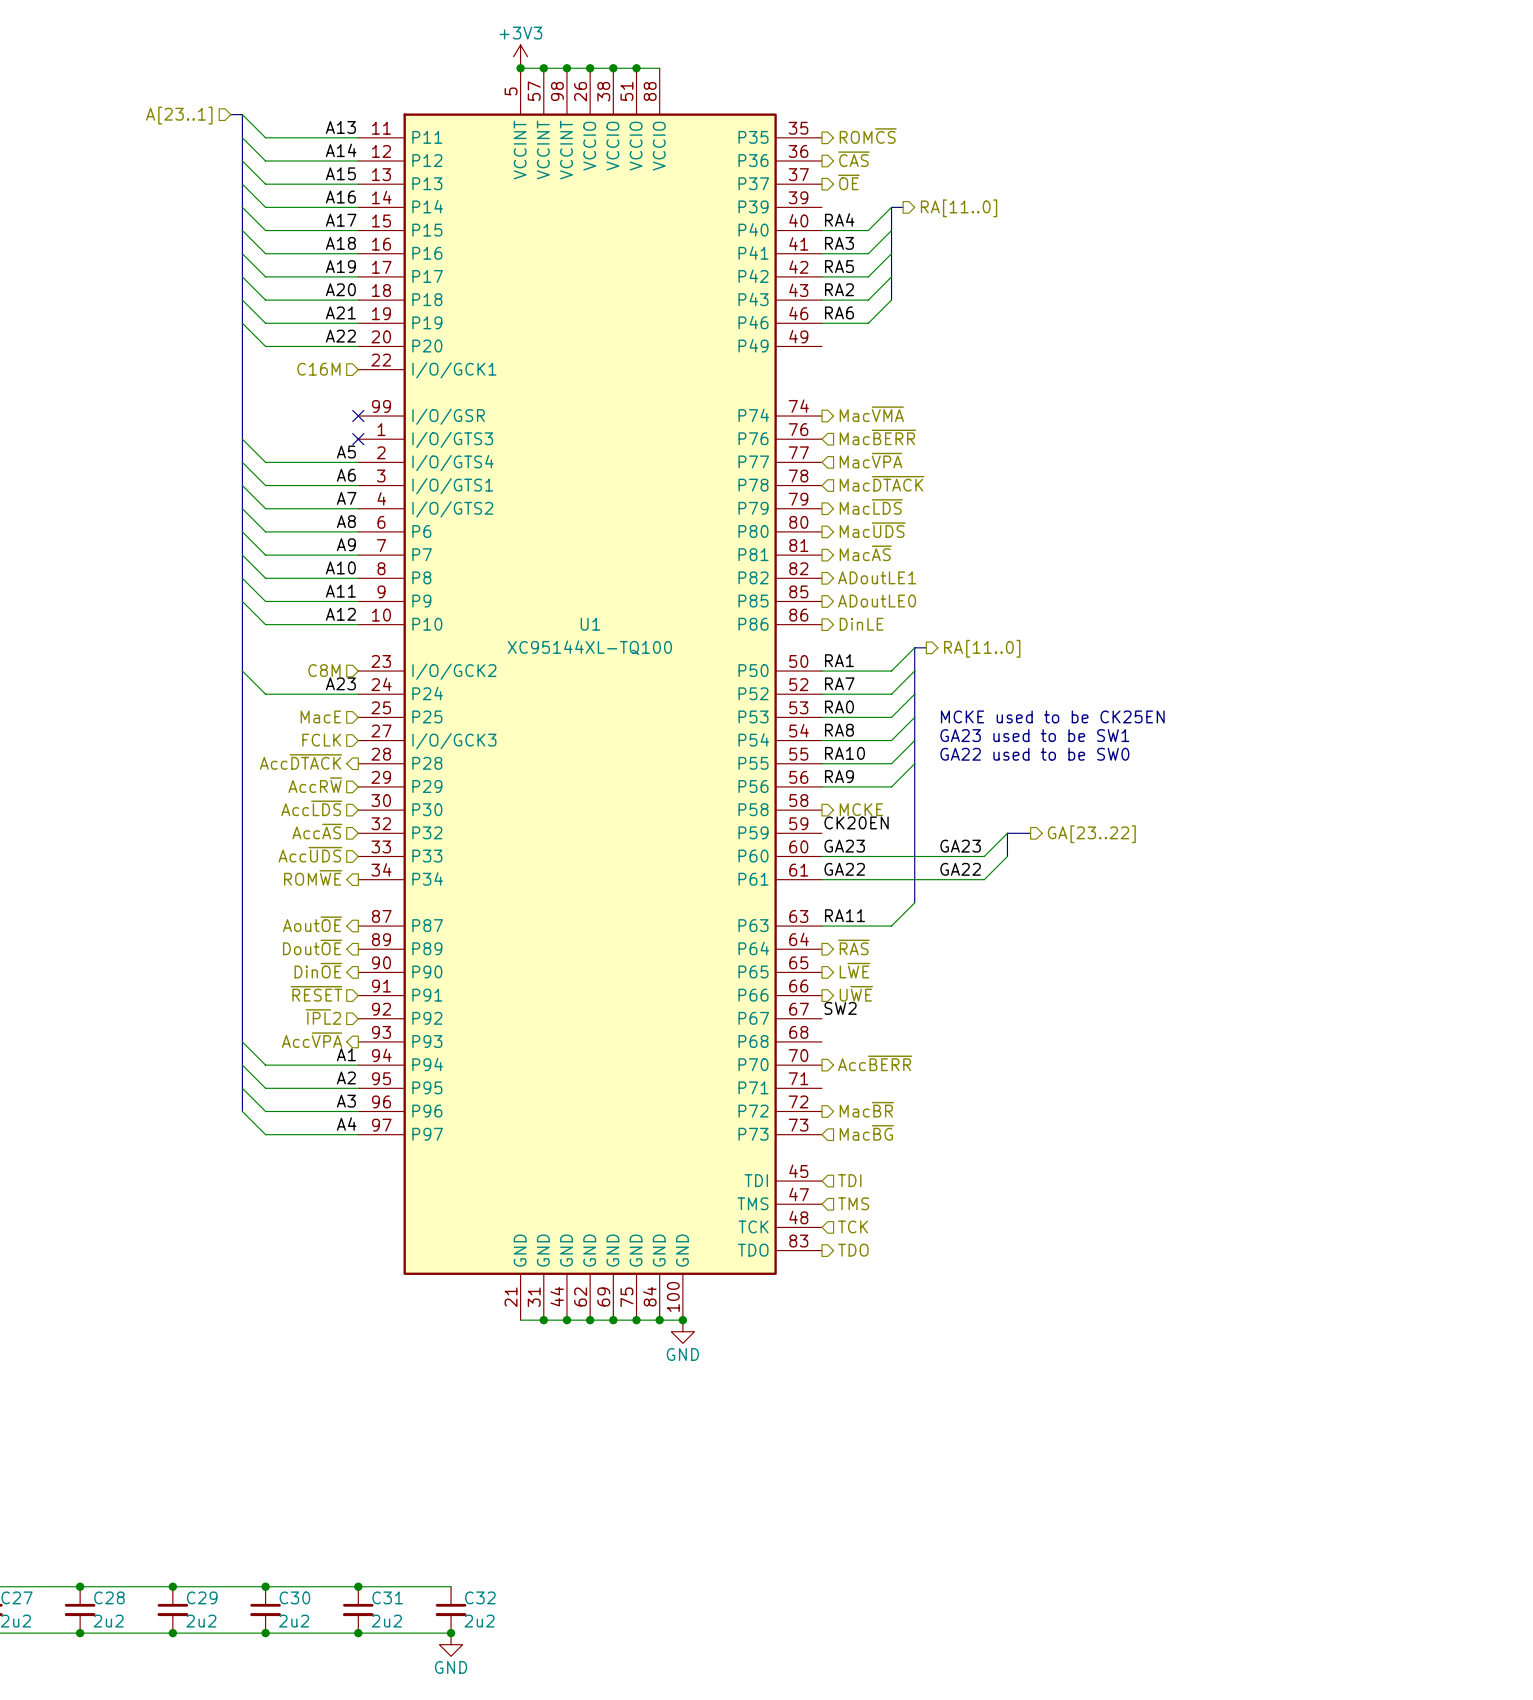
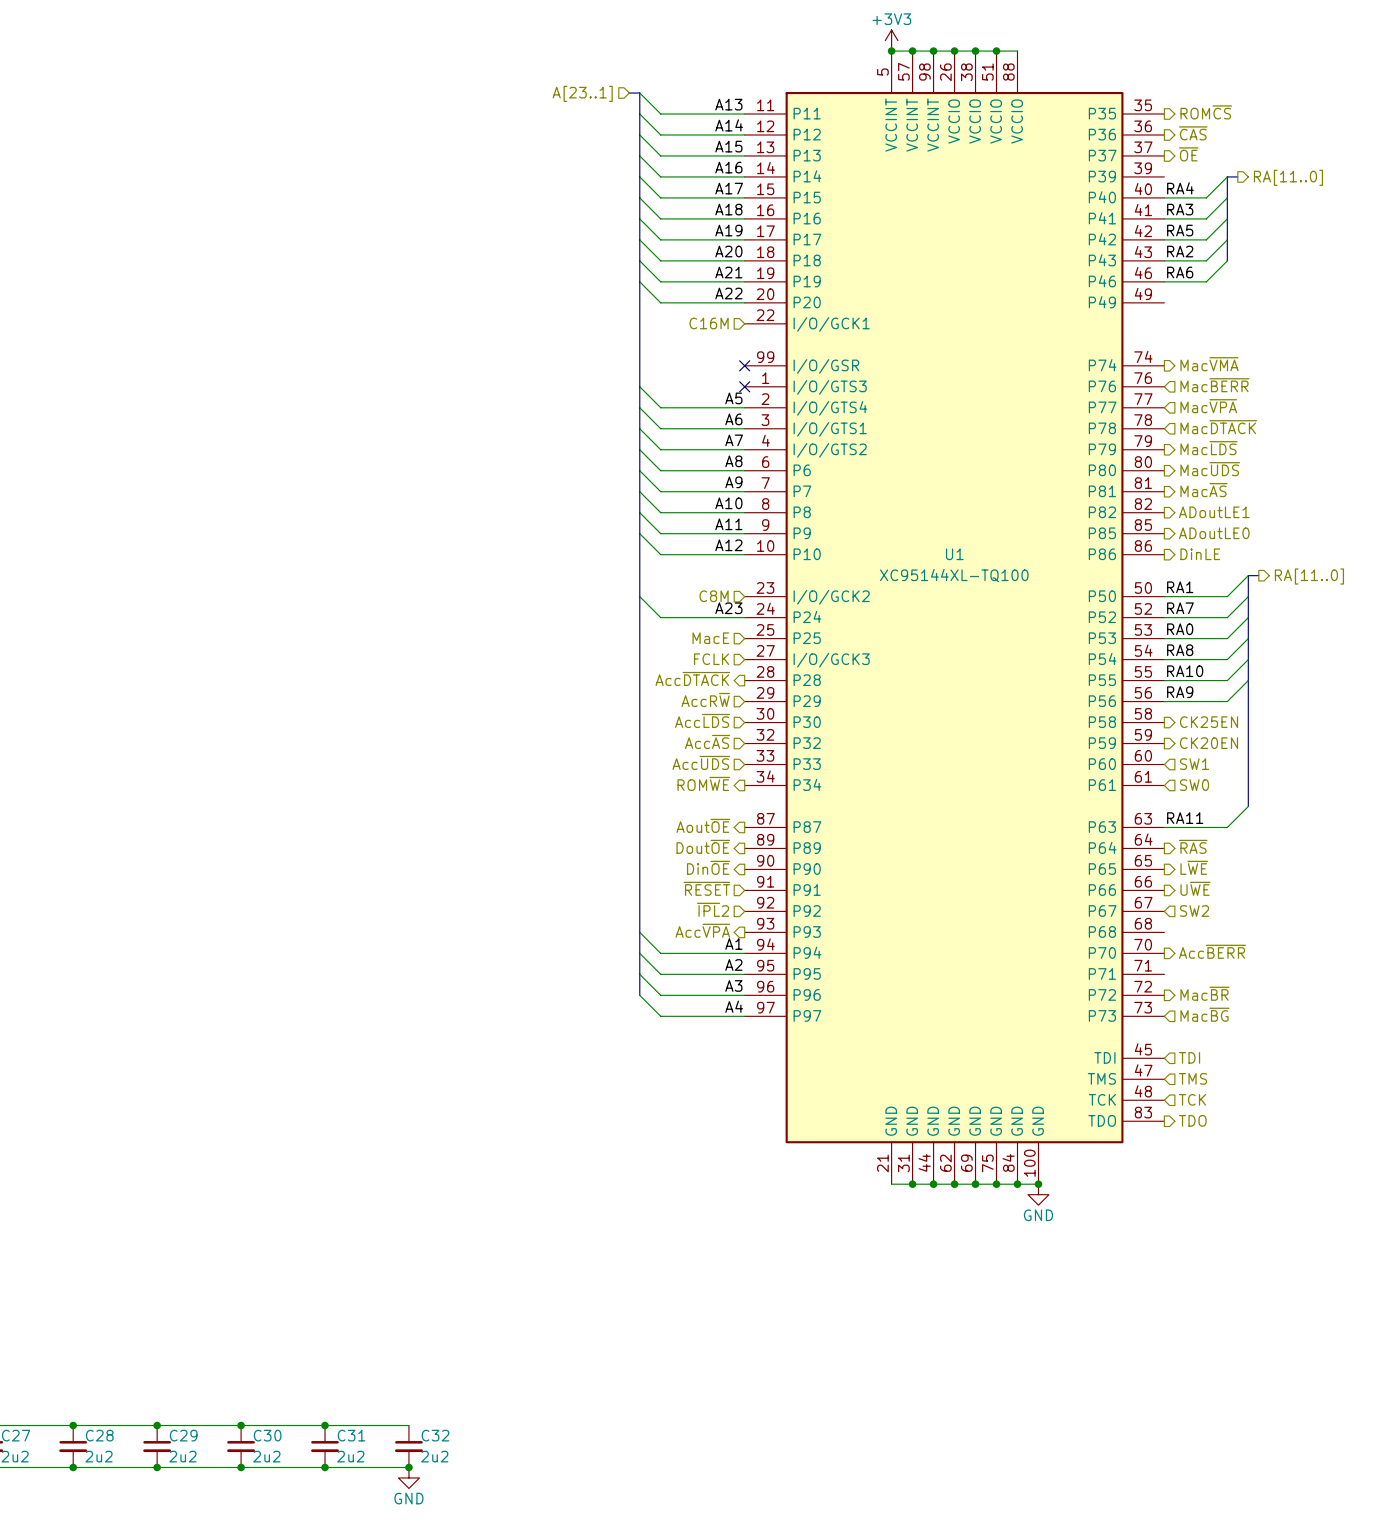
power symbol: +3V3 (520, 56) -> none
power symbol: none -> +3V3 (891, 40)
wire: (520, 68) (659, 68) -> none
junction: (520, 68) -> none
junction: (543, 68) -> none
junction: (566, 68) -> none
junction: (590, 68) -> none
junction: (613, 68) -> none
junction: (636, 68) -> none
wire: none -> (891, 51) (1017, 51)
junction: none -> (891, 51)
junction: none -> (912, 51)
junction: none -> (933, 51)
junction: none -> (954, 51)
junction: none -> (975, 51)
junction: none -> (996, 51)
bus: (230, 114) (242, 114) (242, 1111) -> none
wire: (242, 114) (265, 137) (358, 137) -> none
bus: none -> (629, 93) (639, 93) (639, 995)
hierarchical label: A[23..1] (179, 115) -> none
hierarchical label: none -> A[23..1] (582, 93)
label: A13 (340, 127) -> none
label: none -> A13 (728, 104)
hierarchical label: ROM~{CS} (868, 136) -> none
hierarchical label: none -> ROM~{CS} (1206, 112)
wire: (242, 137) (265, 161) (358, 161) -> none
label: A14 (341, 150) -> none
label: none -> A14 (729, 125)
hierarchical label: ~{CAS} (853, 159) -> none
hierarchical label: none -> ~{CAS} (1193, 133)
wire: (242, 161) (265, 184) (358, 184) -> none
label: A15 (340, 173) -> none
label: none -> A15 (728, 146)
hierarchical label: ~{OE} (848, 182) -> none
hierarchical label: none -> ~{OE} (1188, 154)
wire: (242, 184) (265, 207) (358, 207) -> none
label: A16 (340, 197) -> none
label: none -> A16 (728, 167)
wire: (242, 207) (265, 230) (358, 230) -> none
bus: (903, 207) (891, 207) (891, 300) -> none
wire: none -> (1227, 176) (1206, 197) (1164, 197)
bus: none -> (1237, 176) (1227, 176) (1227, 260)
hierarchical label: RA[11..0] (959, 208) -> none
hierarchical label: none -> RA[11..0] (1288, 177)
label: RA4 (839, 219) -> A17 (729, 188)
label: none -> RA4 (1180, 188)
label: A17 (341, 220) -> none
wire: (242, 230) (265, 253) (358, 253) -> none
wire: none -> (1227, 197) (1206, 218) (1164, 218)
label: A18 (340, 243) -> none
label: RA3 (839, 243) -> A18 (728, 209)
label: none -> RA3 (1180, 209)
wire: (242, 253) (265, 276) (358, 276) -> none
wire: none -> (1227, 218) (1206, 239) (1164, 239)
label: A19 (340, 266) -> none
label: RA5 (839, 266) -> A19 (728, 230)
label: none -> RA5 (1180, 230)
wire: (242, 276) (265, 300) (358, 300) -> none
wire: none -> (1227, 239) (1206, 260) (1164, 260)
label: A20 (340, 289) -> none
label: RA2 (839, 289) -> A20 (728, 251)
label: none -> RA2 (1180, 251)
wire: (242, 300) (265, 323) (358, 323) -> none
wire: none -> (1227, 260) (1206, 281) (1164, 281)
label: A21 (340, 312) -> none
label: RA6 (839, 312) -> A21 (728, 272)
label: none -> RA6 (1180, 272)
wire: (242, 323) (265, 346) (358, 346) -> none
label: A22 (340, 336) -> none
label: none -> A22 (728, 293)
hierarchical label: C16M (318, 369) -> none
hierarchical label: none -> C16M (709, 323)
hierarchical label: Mac~{VMA} (871, 414) -> none
hierarchical label: none -> Mac~{VMA} (1209, 364)
no-connect mark: (358, 416) -> none
no-connect mark: none -> (744, 365)
hierarchical label: Mac~{BERR} (877, 437) -> none
hierarchical label: none -> Mac~{BERR} (1214, 385)
wire: (242, 439) (265, 462) (358, 462) -> none
no-connect mark: (358, 439) -> none
no-connect mark: none -> (744, 386)
label: A5 (346, 452) -> none
label: none -> A5 (733, 398)
hierarchical label: Mac~{VPA} (871, 460) -> none
hierarchical label: none -> Mac~{VPA} (1208, 406)
wire: (242, 462) (265, 485) (358, 485) -> none
label: A6 (346, 475) -> none
label: none -> A6 (733, 419)
hierarchical label: Mac~{DTACK} (882, 483) -> none
hierarchical label: none -> Mac~{DTACK} (1218, 427)
wire: (242, 485) (265, 508) (358, 508) -> none
label: A7 (346, 498) -> none
label: none -> A7 (734, 440)
hierarchical label: Mac~{LDS} (871, 506) -> none
hierarchical label: none -> Mac~{LDS} (1208, 448)
wire: (242, 508) (265, 531) (358, 531) -> none
label: A8 (346, 521) -> none
label: none -> A8 (733, 461)
hierarchical label: Mac~{UDS} (872, 530) -> none
hierarchical label: none -> Mac~{UDS} (1210, 469)
wire: (242, 531) (265, 555) (358, 555) -> none
label: A9 (346, 544) -> none
label: none -> A9 (733, 482)
hierarchical label: Mac~{AS} (865, 553) -> none
hierarchical label: none -> Mac~{AS} (1203, 490)
wire: (242, 555) (265, 578) (358, 578) -> none
label: A10 (340, 567) -> none
label: none -> A10 (728, 503)
hierarchical label: ADoutLE1 (877, 577) -> none
hierarchical label: none -> ADoutLE1 (1214, 512)
wire: (242, 578) (265, 601) (358, 601) -> none
label: A11 (340, 591) -> none
label: none -> A11 (728, 524)
wire: (242, 601) (265, 624) (358, 624) -> none
hierarchical label: ADoutLE0 (877, 601) -> none
hierarchical label: none -> ADoutLE0 (1214, 533)
label: A12 (340, 614) -> none
label: none -> A12 (728, 545)
hierarchical label: DinLE (861, 624) -> none
hierarchical label: none -> DinLE (1200, 554)
bus: (926, 647) (914, 647) (914, 902) -> none
wire: none -> (1248, 575) (1227, 596) (1164, 596)
bus: none -> (1258, 575) (1248, 575) (1248, 806)
hierarchical label: RA[11..0] (982, 648) -> none
hierarchical label: none -> RA[11..0] (1309, 576)
label: RA1 (839, 660) -> none
label: none -> RA1 (1180, 587)
hierarchical label: C8M (324, 670) -> none
hierarchical label: none -> C8M (714, 596)
wire: (242, 671) (265, 694) (358, 694) -> none
wire: none -> (1248, 596) (1227, 617) (1164, 617)
label: A23 (340, 683) -> none
label: RA7 (839, 683) -> A23 (728, 608)
label: none -> RA7 (1180, 608)
U1 position: (590, 694) -> (954, 617)
wire: none -> (1248, 617) (1227, 638) (1164, 638)
label: RA0 (839, 707) -> none
label: none -> RA0 (1180, 629)
hierarchical label: MacE (320, 716) -> none
hierarchical label: none -> MacE (710, 638)
text: MCKE used to be CK25EN (1052, 716) -> none
wire: none -> (1248, 638) (1227, 659) (1164, 659)
label: RA8 (839, 730) -> none
label: none -> RA8 (1180, 650)
text: GA23 used to be SW1 (1034, 735) -> none
hierarchical label: FCLK (321, 740) -> none
hierarchical label: none -> FCLK (711, 659)
wire: none -> (1248, 659) (1227, 680) (1164, 680)
label: RA10 (844, 753) -> none
label: none -> RA10 (1185, 671)
text: GA22 used to be SW0 (1034, 754) -> none
hierarchical label: Acc~{DTACK} (300, 761) -> none
hierarchical label: none -> Acc~{DTACK} (692, 678)
wire: none -> (1248, 680) (1227, 701) (1164, 701)
label: RA9 (839, 776) -> none
label: none -> RA9 (1180, 692)
hierarchical label: AccR~{W} (315, 785) -> none
hierarchical label: none -> AccR~{W} (705, 699)
hierarchical label: Acc~{LDS} (311, 808) -> none
hierarchical label: none -> Acc~{LDS} (702, 720)
hierarchical label: MCKE (861, 809) -> none
hierarchical label: none -> CK25EN (1209, 722)
label: CK20EN (856, 822) -> none
hierarchical label: Acc~{AS} (317, 831) -> none
hierarchical label: none -> Acc~{AS} (707, 741)
hierarchical label: none -> CK20EN (1209, 743)
bus: (1030, 833) (1007, 833) (1007, 856) -> none
hierarchical label: GA[23..22] (1091, 834) -> none
label: GA23 (844, 846) -> none
label: GA23 (960, 846) -> none
hierarchical label: Acc~{UDS} (310, 854) -> none
hierarchical label: none -> Acc~{UDS} (701, 762)
hierarchical label: none -> SW1 (1194, 764)
label: GA22 (844, 869) -> none
label: GA22 (960, 869) -> none
hierarchical label: ROM~{WE} (313, 877) -> none
hierarchical label: none -> ROM~{WE} (703, 783)
hierarchical label: none -> SW0 (1194, 785)
wire: none -> (1248, 806) (1227, 827) (1164, 827)
label: RA11 (844, 915) -> none
label: none -> RA11 (1185, 818)
hierarchical label: Aout~{OE} (312, 924) -> none
hierarchical label: none -> Aout~{OE} (703, 825)
hierarchical label: Dout~{OE} (312, 947) -> none
hierarchical label: none -> Dout~{OE} (703, 846)
hierarchical label: ~{RAS} (853, 947) -> none
hierarchical label: none -> ~{RAS} (1193, 846)
hierarchical label: Din~{OE} (318, 970) -> none
hierarchical label: none -> Din~{OE} (708, 867)
hierarchical label: L~{WE} (854, 970) -> none
hierarchical label: none -> L~{WE} (1194, 867)
hierarchical label: ~{RESET} (316, 993) -> none
hierarchical label: none -> ~{RESET} (706, 888)
hierarchical label: U~{WE} (856, 993) -> none
hierarchical label: none -> U~{WE} (1195, 888)
label: SW2 (840, 1008) -> none
hierarchical label: ~{IPL}2 (323, 1017) -> none
hierarchical label: none -> ~{IPL}2 (713, 909)
hierarchical label: none -> SW2 (1194, 911)
hierarchical label: Acc~{VPA} (312, 1040) -> none
hierarchical label: none -> Acc~{VPA} (702, 930)
wire: (242, 1041) (265, 1065) (358, 1065) -> none
label: A1 (346, 1054) -> none
label: none -> A1 (733, 944)
hierarchical label: Acc~{BERR} (875, 1063) -> none
hierarchical label: none -> Acc~{BERR} (1212, 951)
wire: (242, 1065) (265, 1088) (358, 1088) -> none
label: A2 (346, 1077) -> none
label: none -> A2 (733, 964)
wire: (242, 1088) (265, 1111) (358, 1111) -> none
label: A3 (346, 1101) -> none
label: none -> A3 (733, 985)
hierarchical label: Mac~{BR} (866, 1109) -> none
hierarchical label: none -> Mac~{BR} (1204, 993)
wire: (242, 1111) (265, 1134) (358, 1134) -> none
label: A4 (346, 1124) -> none
label: none -> A4 (734, 1006)
hierarchical label: Mac~{BG} (866, 1132) -> none
hierarchical label: none -> Mac~{BG} (1204, 1014)
hierarchical label: TDI (849, 1180) -> none
hierarchical label: none -> TDI (1189, 1057)
hierarchical label: TMS (853, 1203) -> none
hierarchical label: none -> TMS (1193, 1078)
hierarchical label: TCK (853, 1226) -> none
hierarchical label: none -> TCK (1192, 1099)
hierarchical label: TDO (853, 1250) -> none
hierarchical label: none -> TDO (1192, 1120)
wire: (520, 1320) (682, 1320) -> none
junction: (543, 1320) -> none
junction: (566, 1320) -> none
junction: (590, 1320) -> none
junction: (613, 1320) -> none
junction: (636, 1320) -> none
junction: (659, 1320) -> none
junction: (682, 1320) -> none
wire: none -> (891, 1184) (1038, 1184)
junction: none -> (912, 1184)
junction: none -> (933, 1184)
junction: none -> (954, 1184)
junction: none -> (975, 1184)
junction: none -> (996, 1184)
junction: none -> (1017, 1184)
junction: none -> (1038, 1184)
power symbol: GND (682, 1331) -> none
power symbol: none -> GND (1038, 1194)

